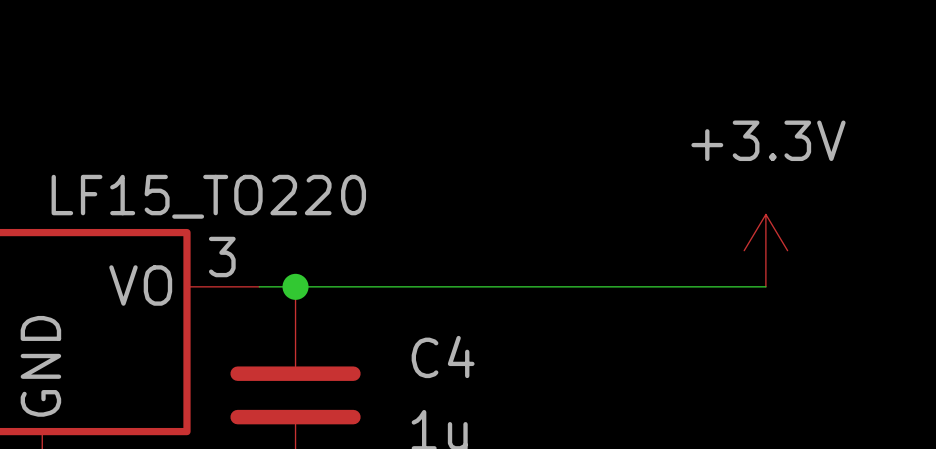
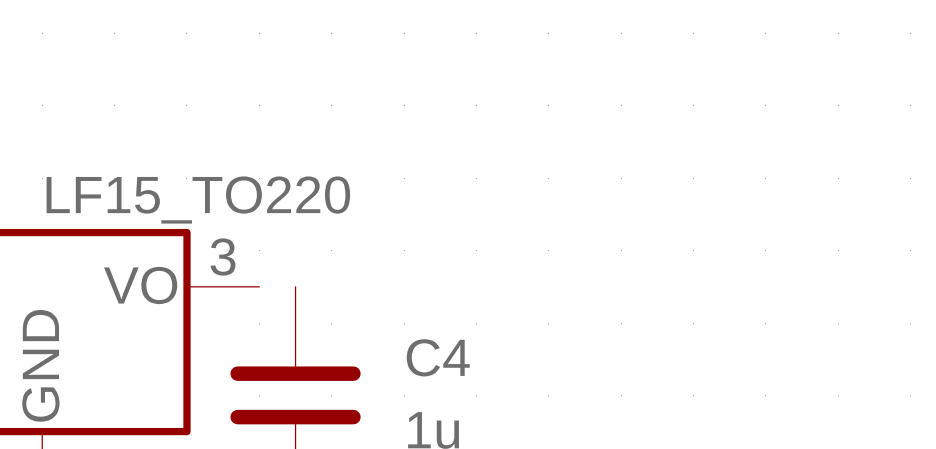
power symbol: +3.3V (765, 250) -> none
wire: (259, 286) (765, 286) -> none
junction: (295, 286) -> none

